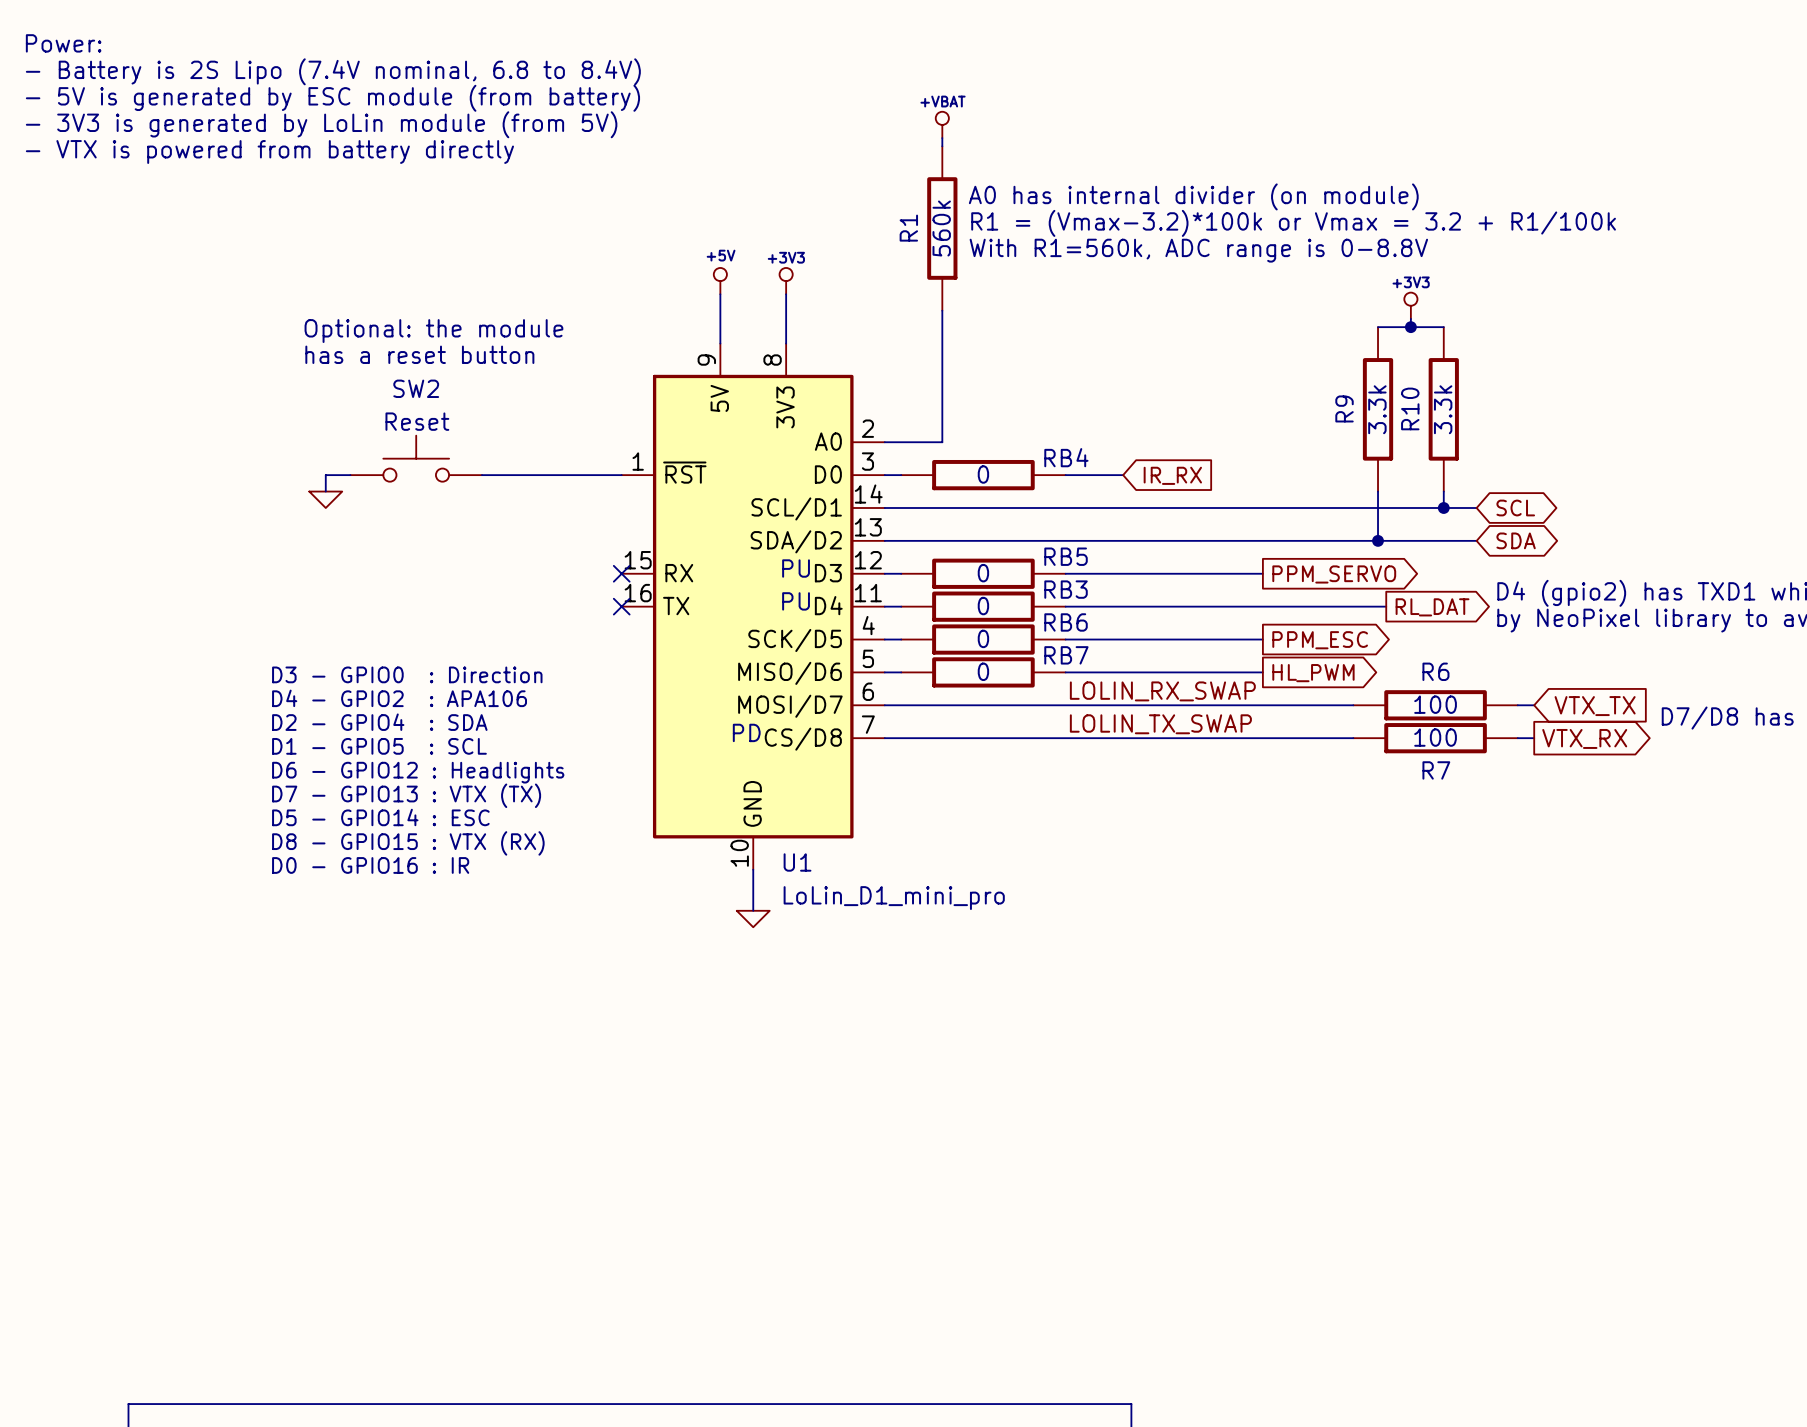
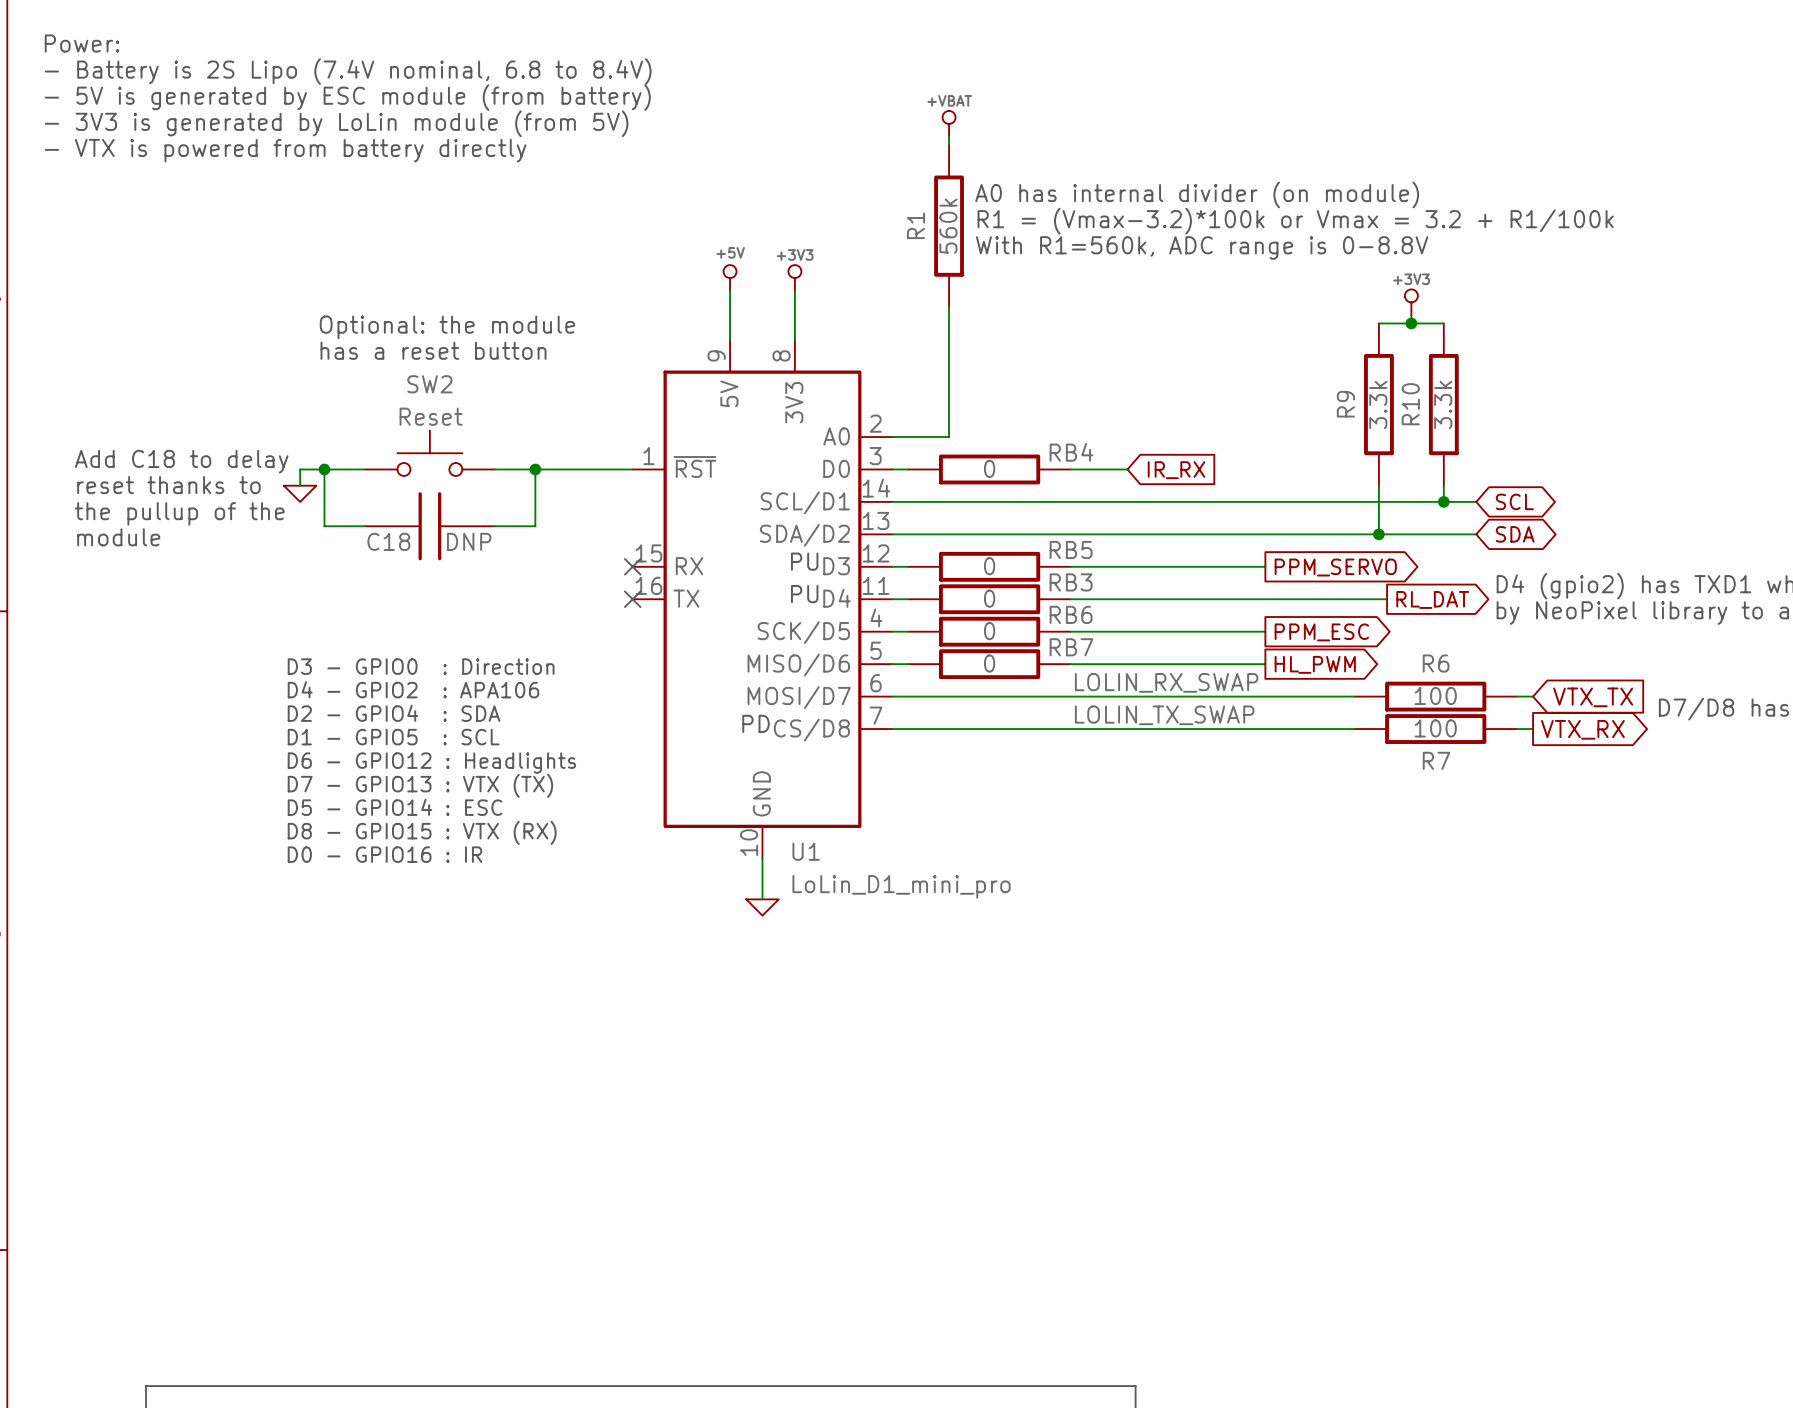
text: none -> Add C18 to delay (181, 461)
wire: none -> (324, 469) (324, 526) (365, 526)
junction: none -> (324, 469)
wire: (325, 475) (325, 491) -> (340, 469) (300, 469) (300, 485)
wire: none -> (535, 469) (535, 526) (494, 526)
junction: none -> (535, 469)
text: none -> reset thanks to (168, 485)
power symbol position: (325, 499) -> (300, 493)
text: none -> the pullup of the (179, 513)
C18: none -> DNP (429, 526)
text: none -> module (118, 537)

